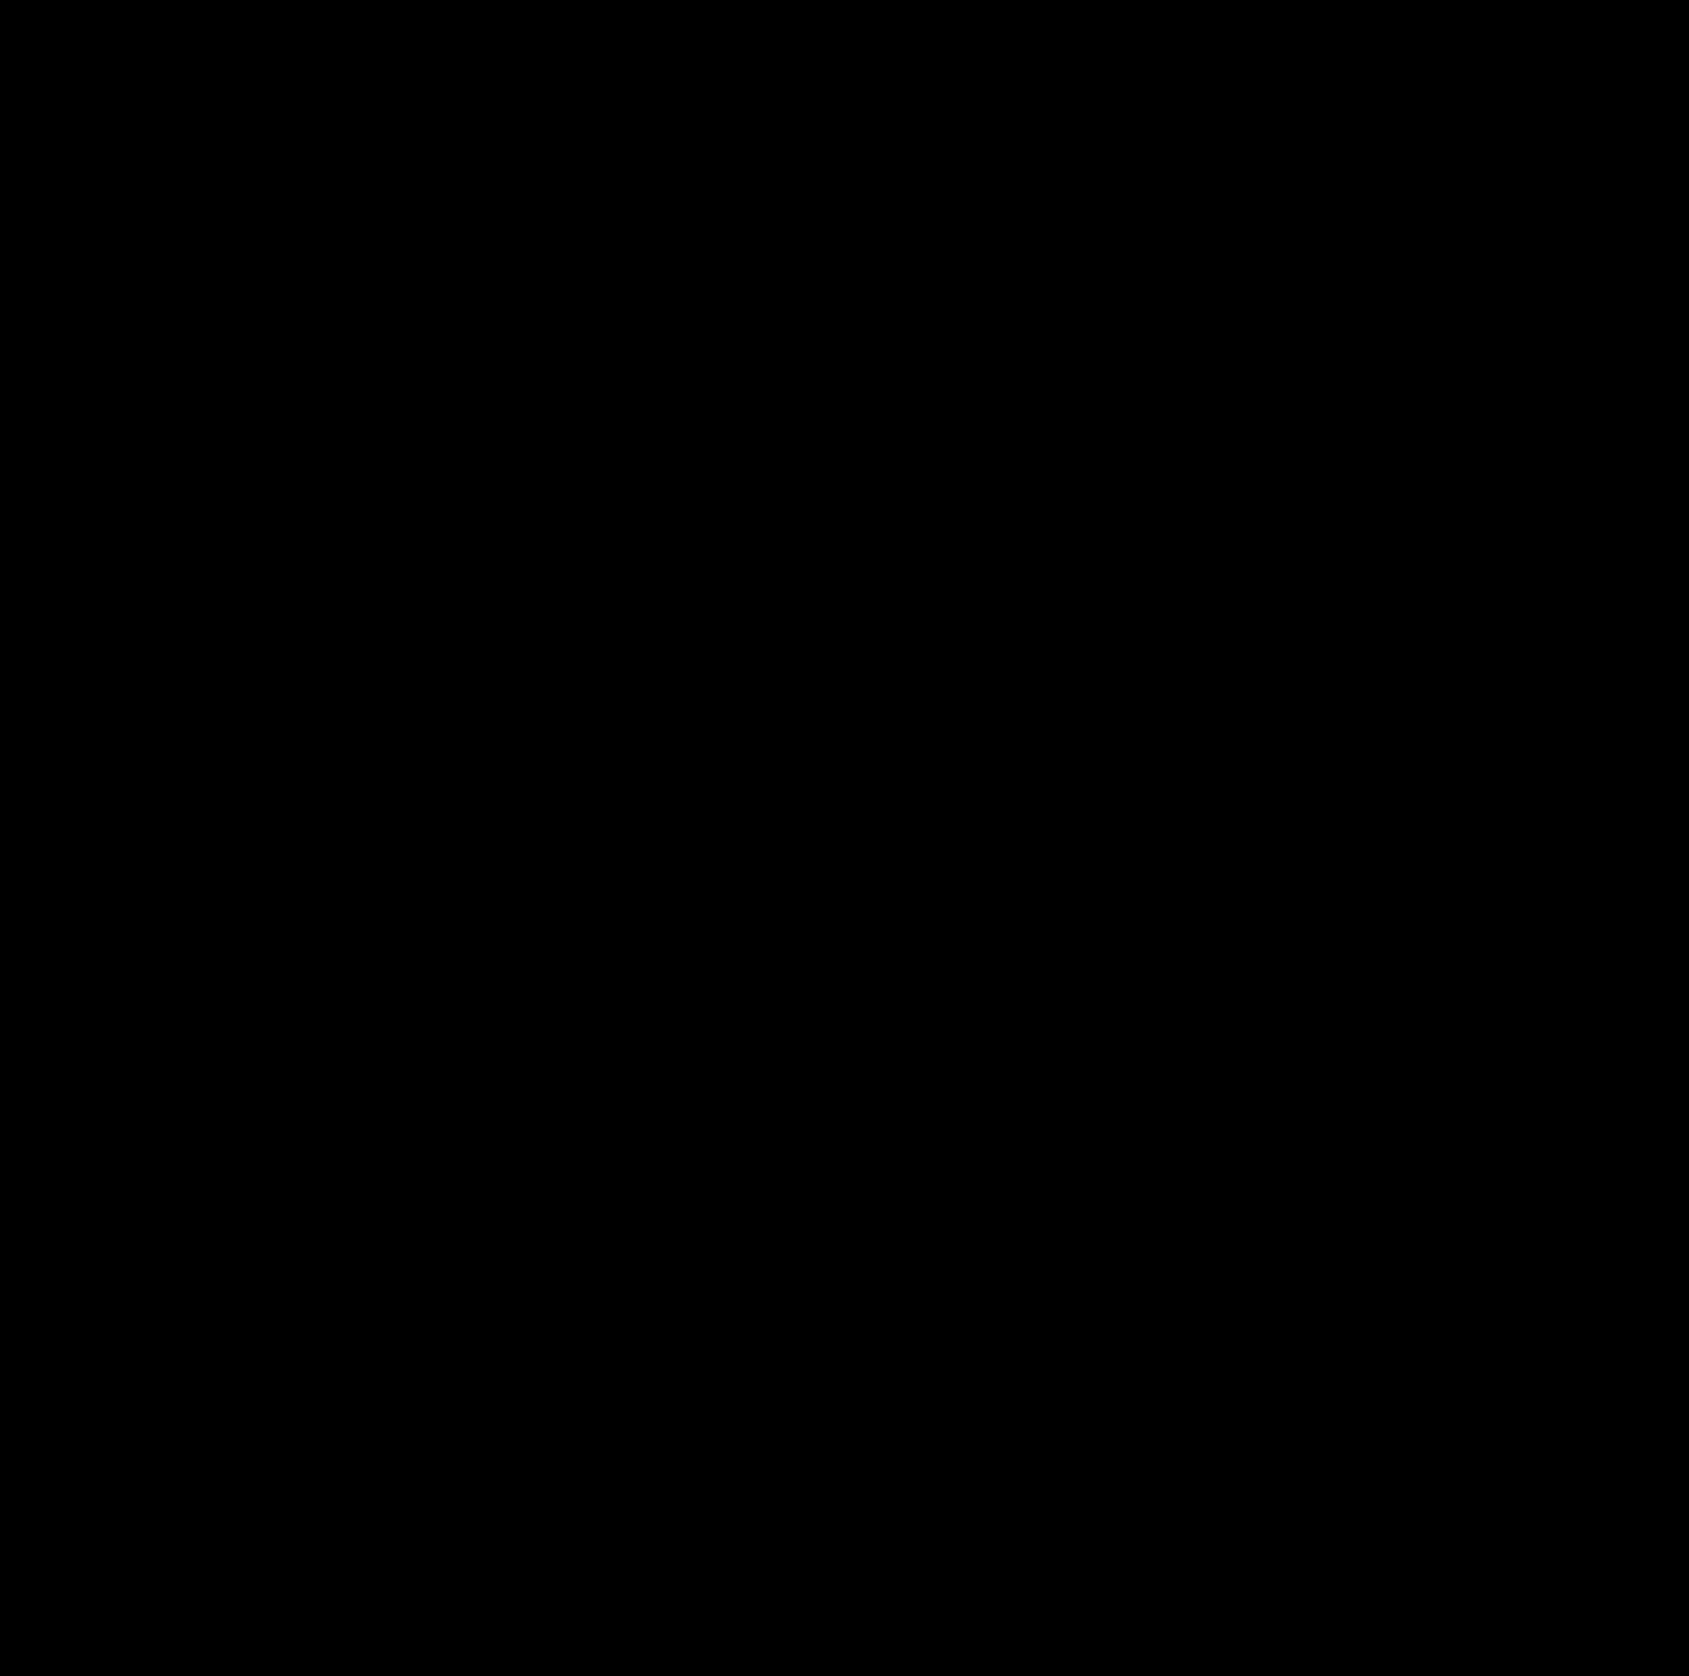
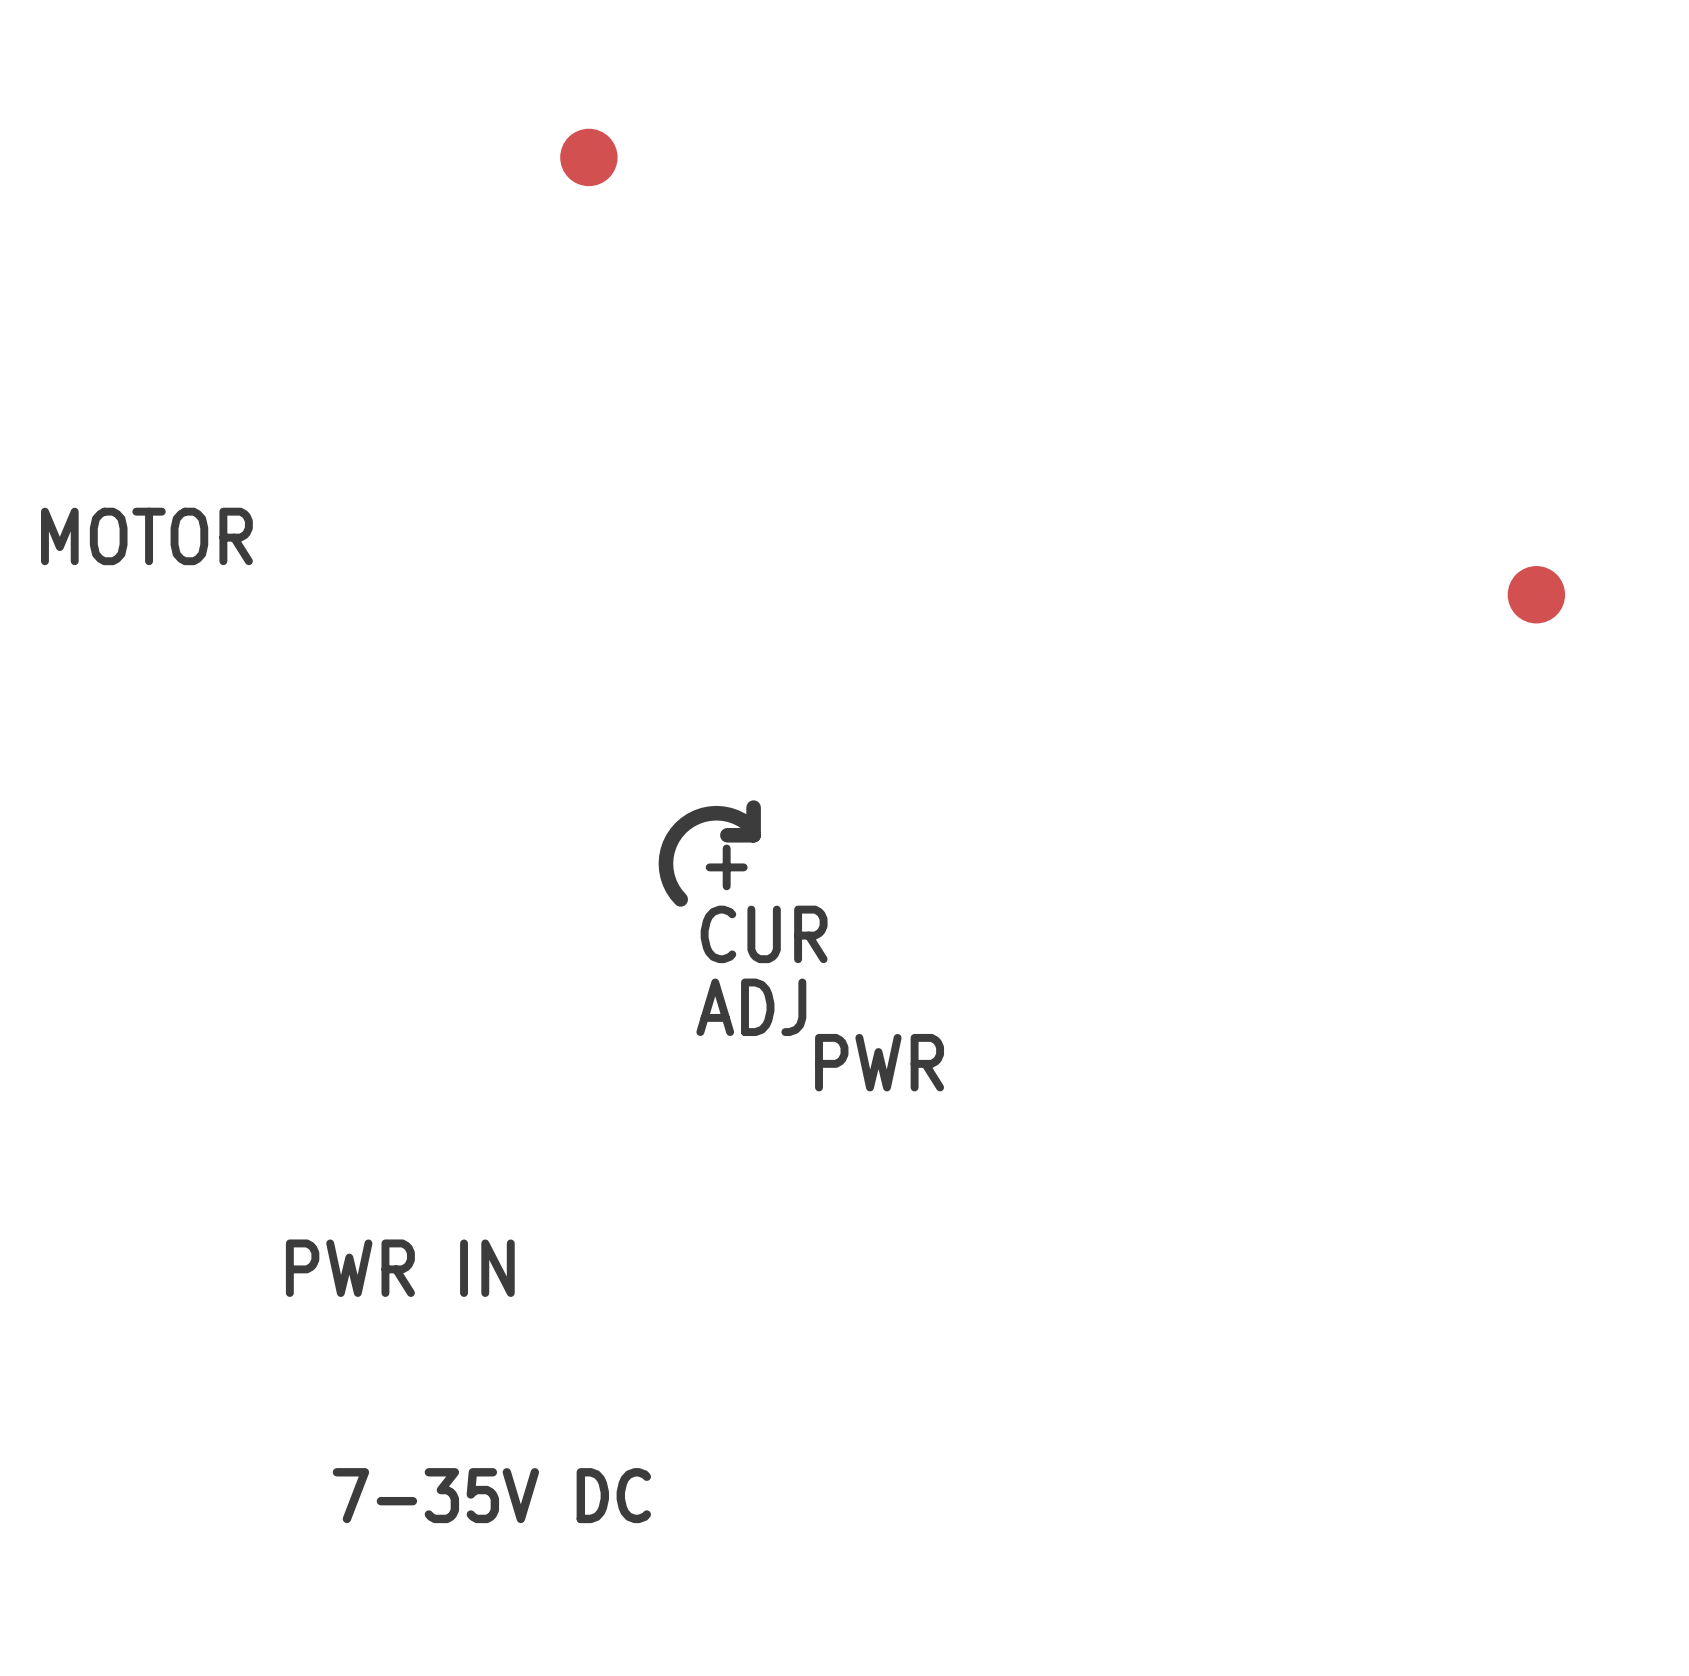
part: none -> (588, 157)
text: none -> MOTOR (146, 536)
part: none -> (1536, 594)
line: none -> (753, 807) (753, 835) (727, 835)
line: none -> (752, 827) (735, 817) (716, 813) (697, 817) (680, 827) (669, 844) (665, 863) (669, 883) (680, 899)
text: none -> + (726, 867)
text: none -> CUR (764, 934)
text: none -> ADJ (751, 1007)
text: none -> PWR (879, 1062)
text: none -> PWR IN (400, 1268)
text: none -> 7-35V DC (491, 1495)

